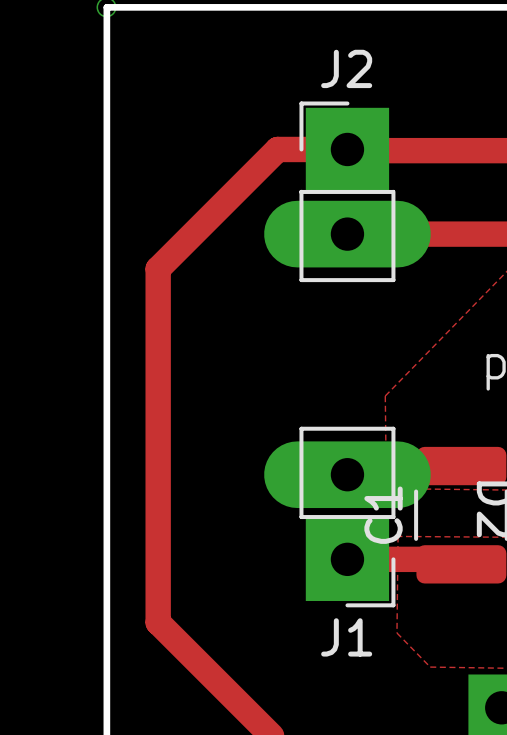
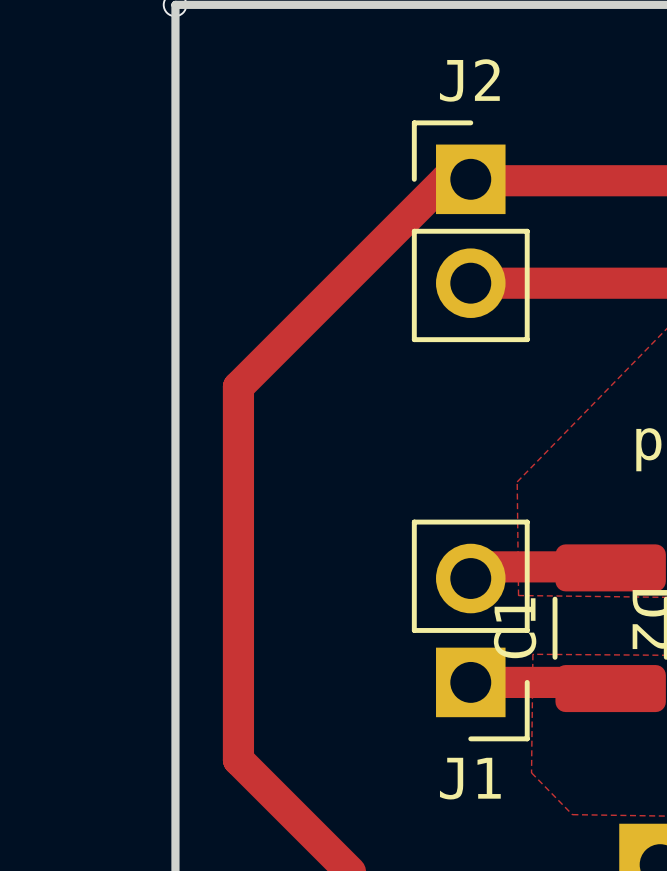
J2 footprint: [264, 101, 431, 283] -> [411, 120, 530, 343]
top track: (327, 149) (277, 149) (158, 268) (158, 318) -> (446, 179) (238, 386)
J1 footprint: [264, 426, 431, 608] -> [411, 519, 530, 742]

